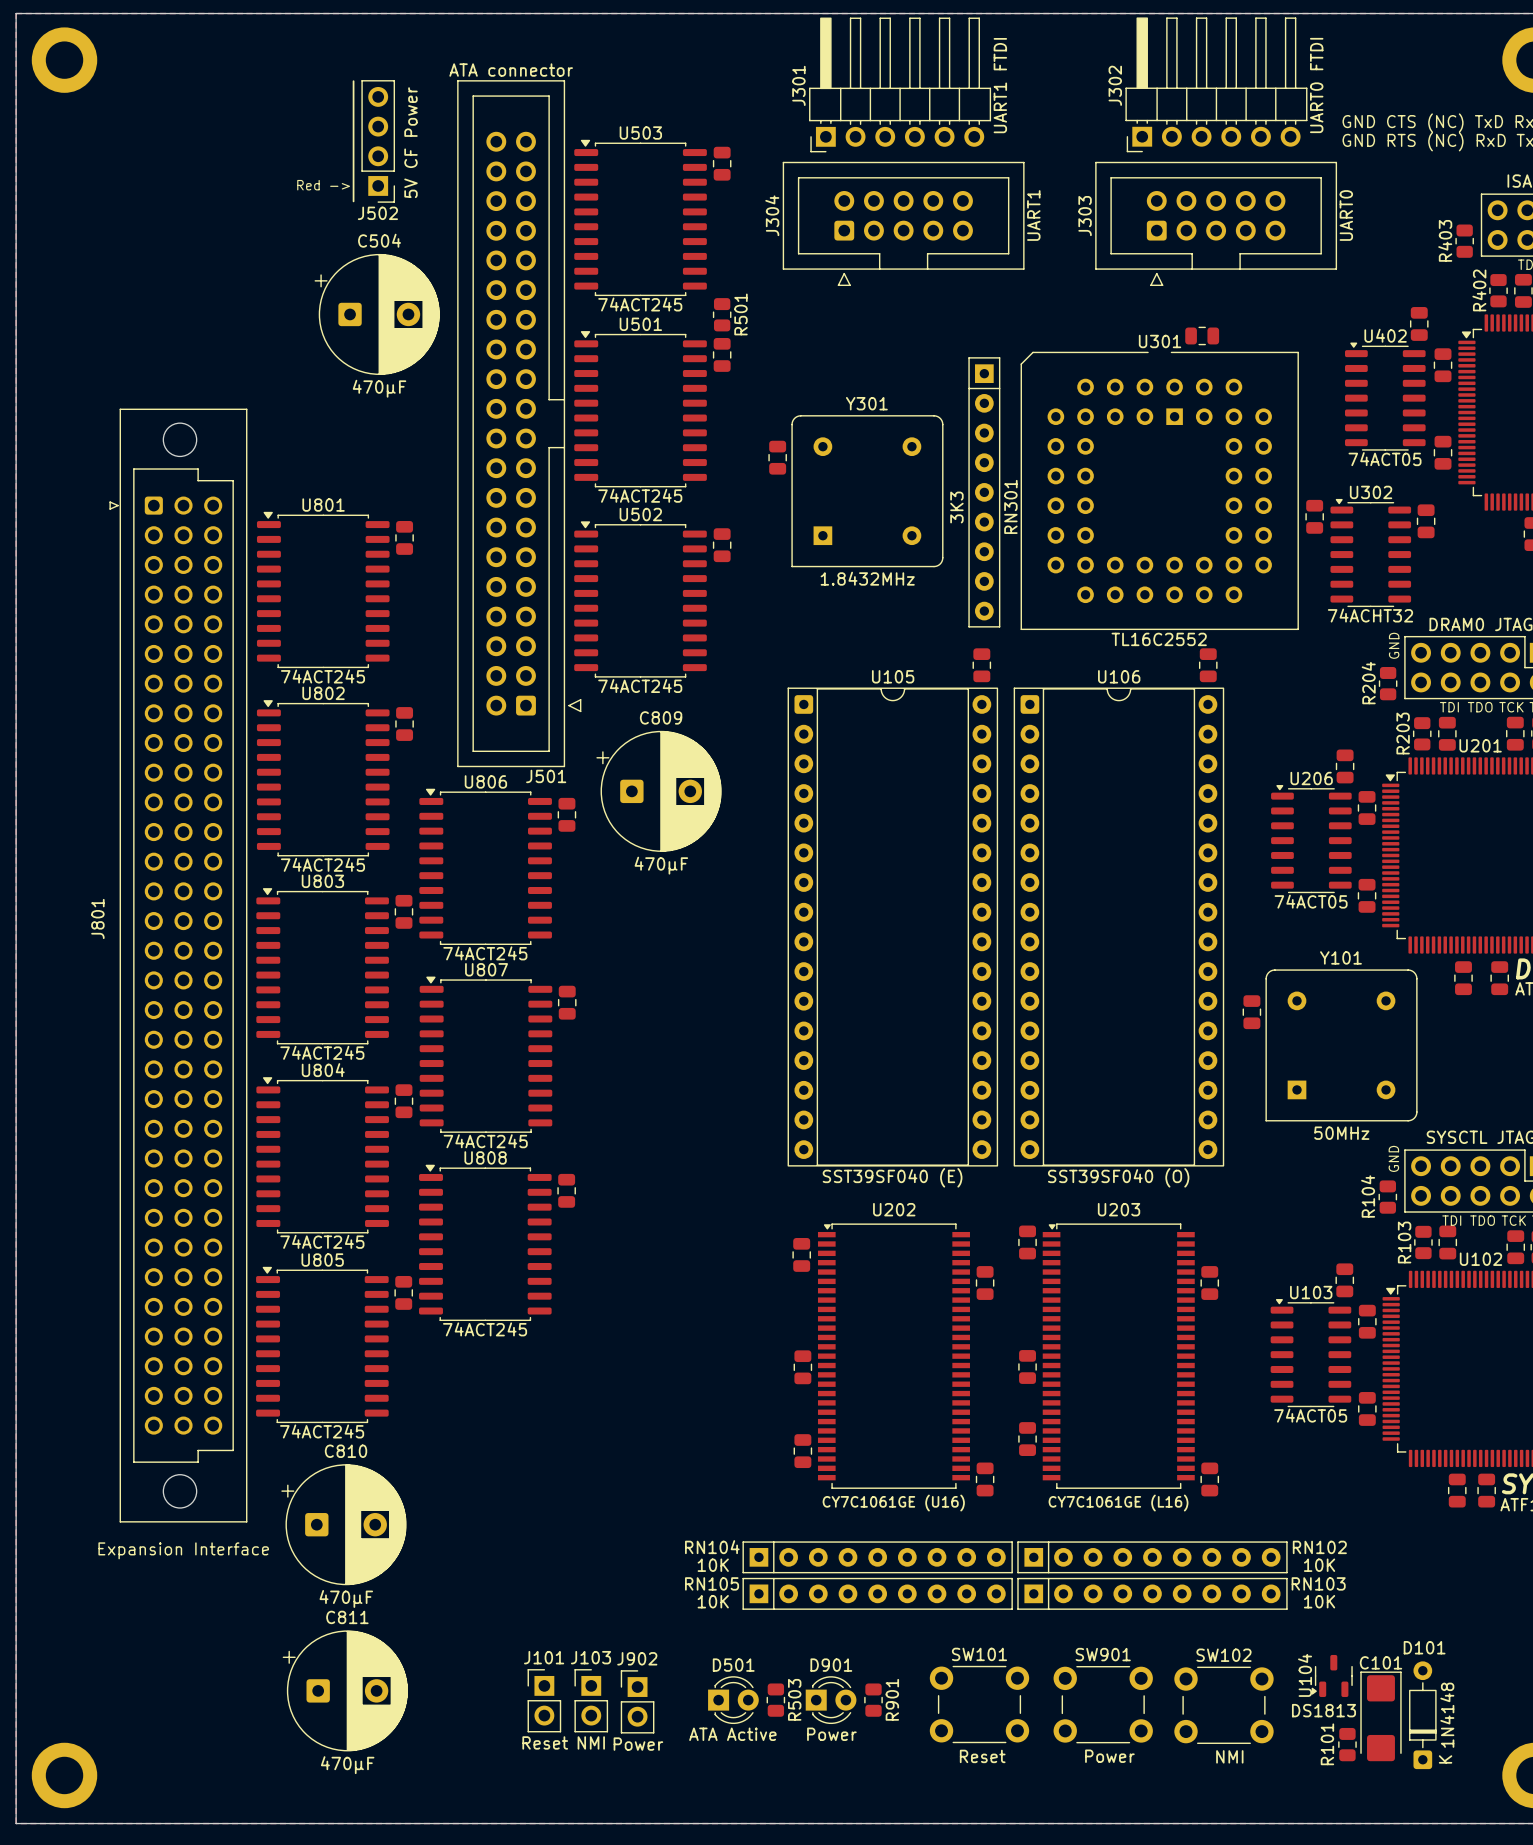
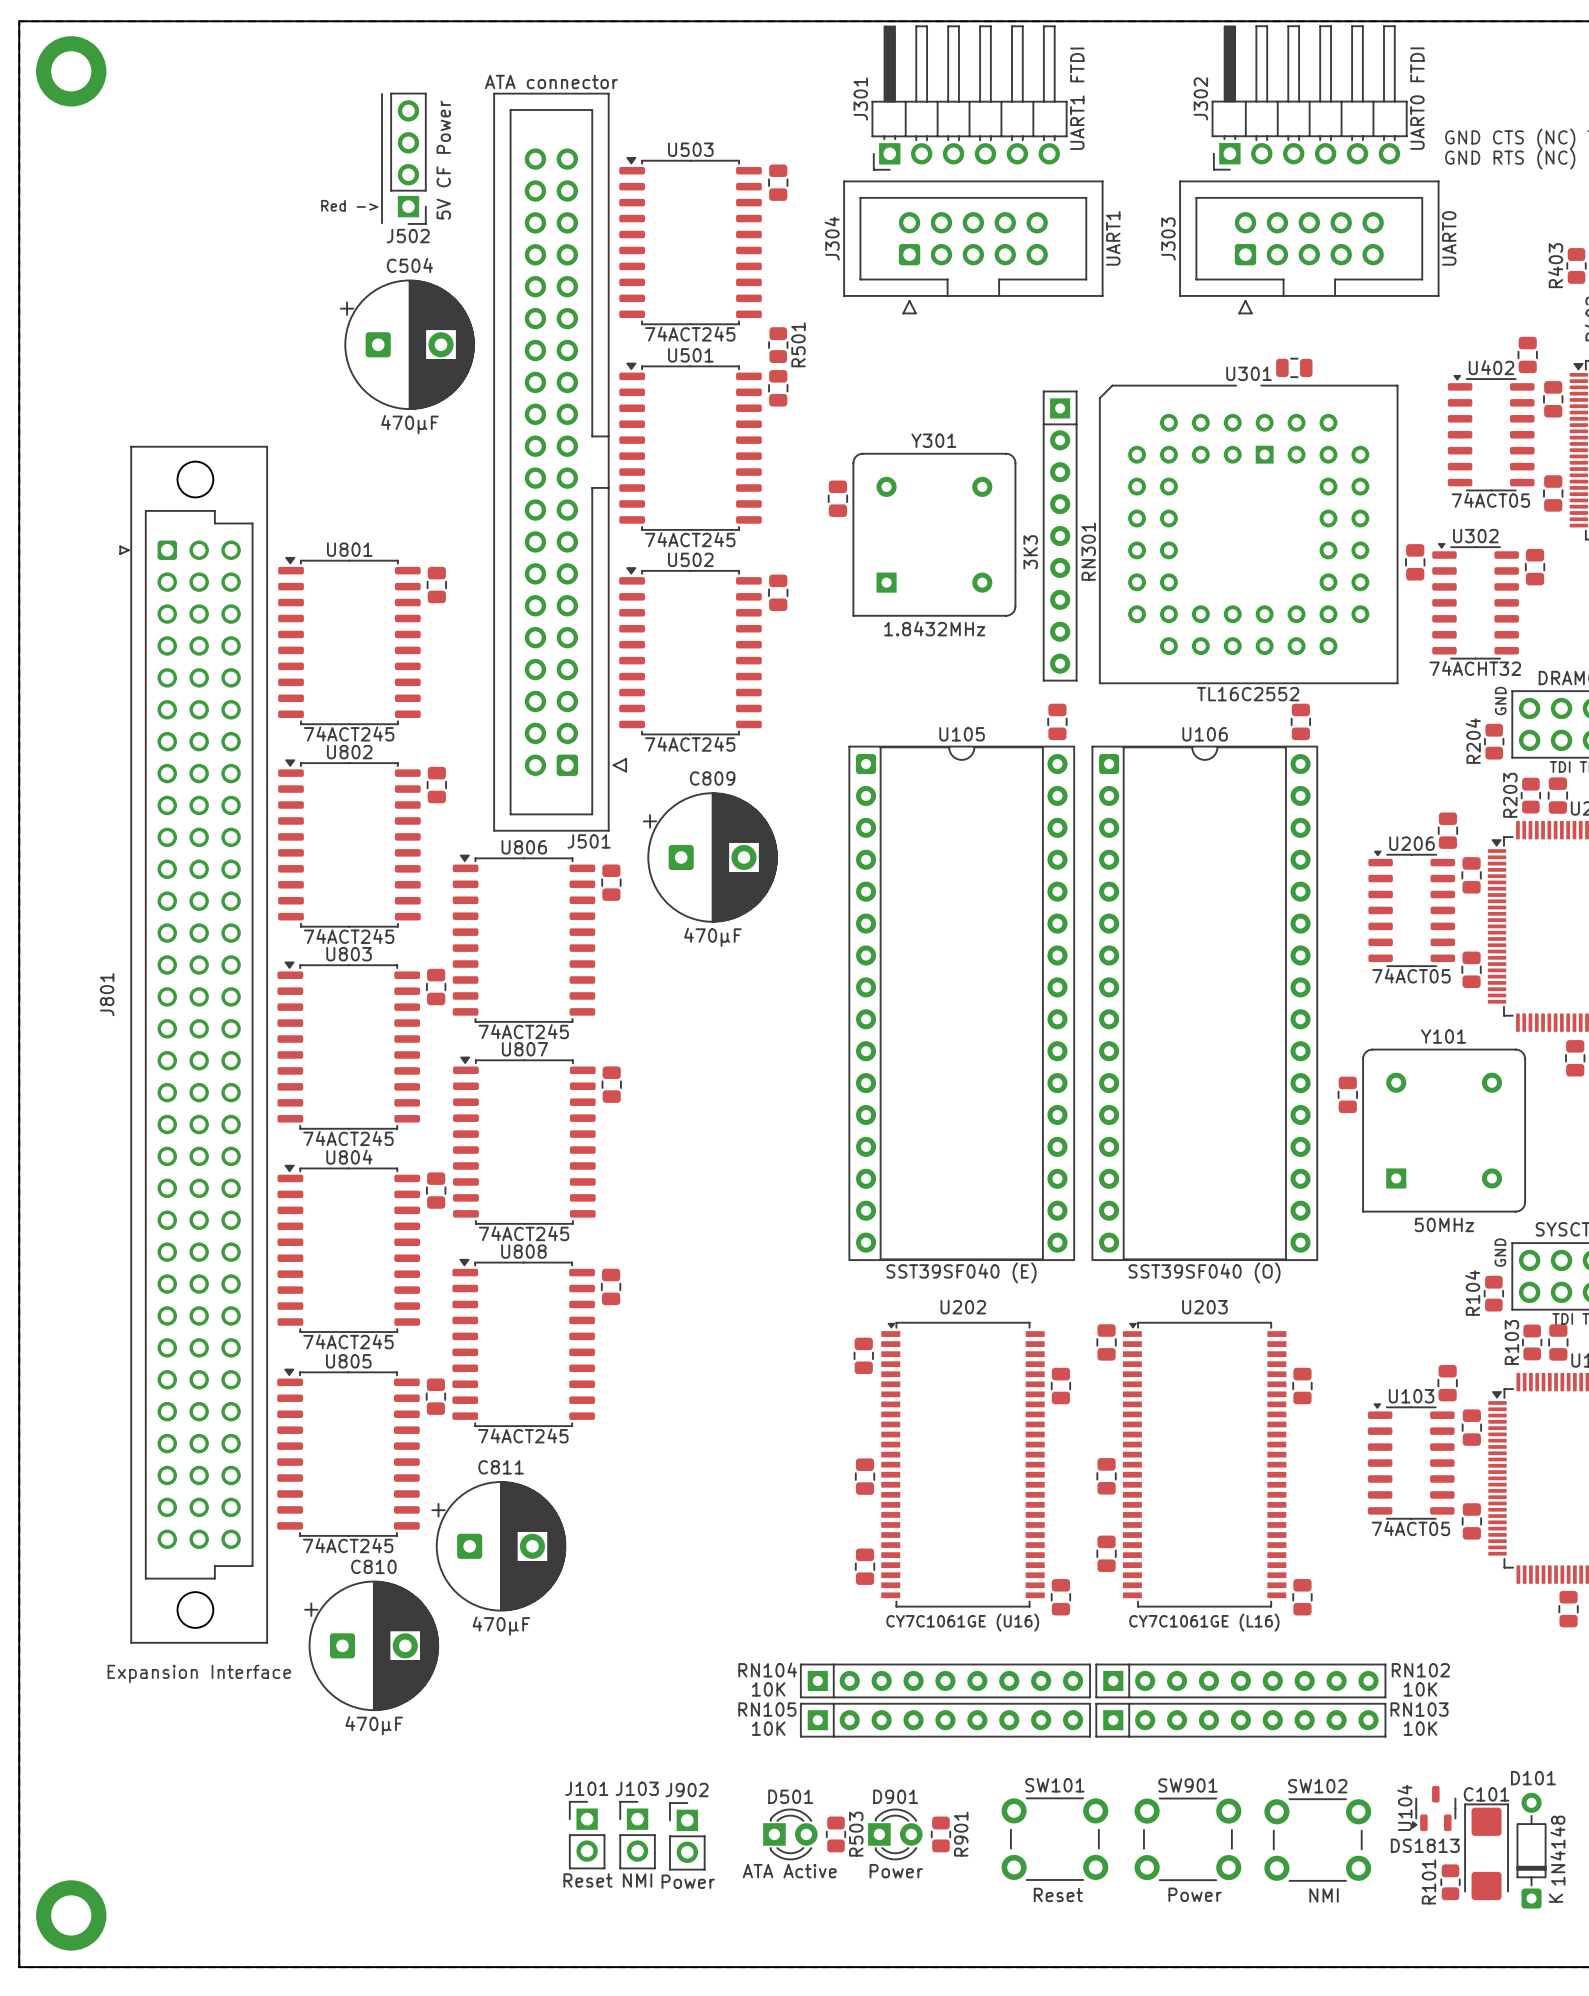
C811 position: (345, 1690) -> (498, 1546)

